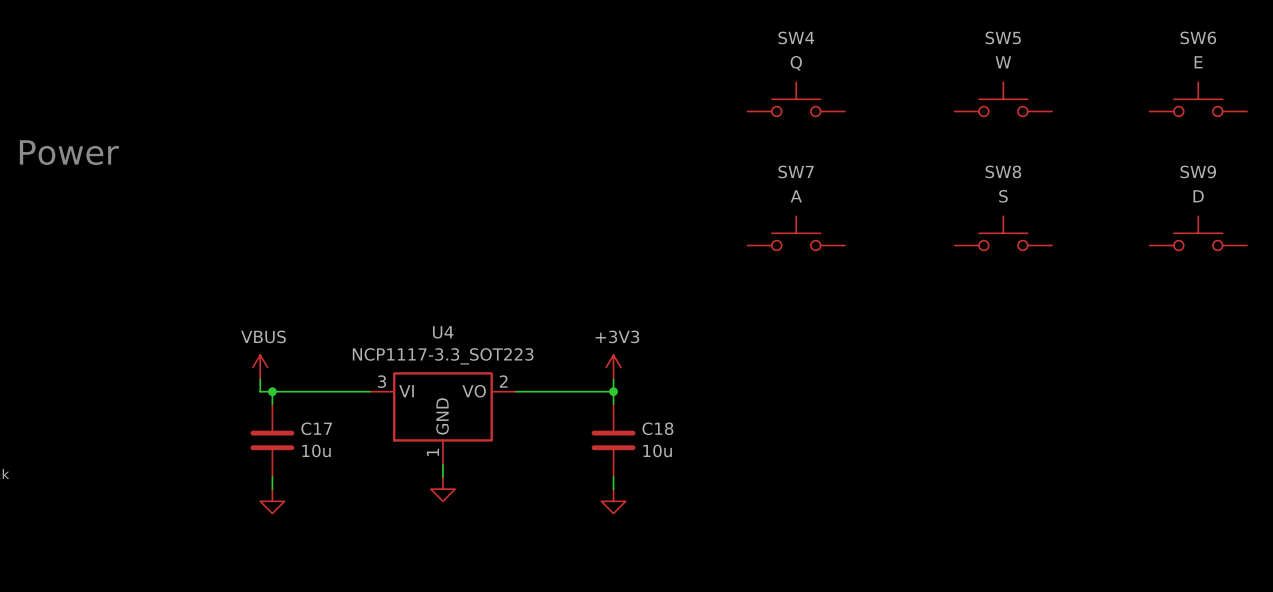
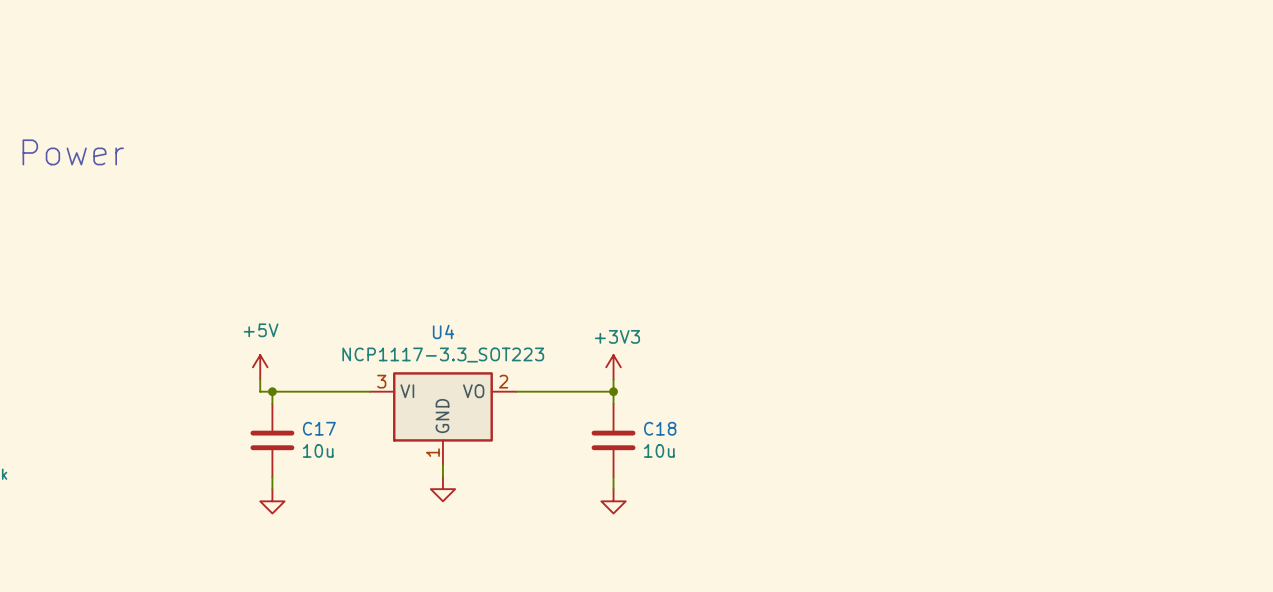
SW4: Q (796, 99) -> none
SW5: W (1003, 99) -> none
SW6: E (1198, 99) -> none
SW7: A (796, 233) -> none
SW8: S (1003, 233) -> none
SW9: D (1198, 233) -> none
power symbol: VBUS (260, 367) -> +5V (260, 367)

